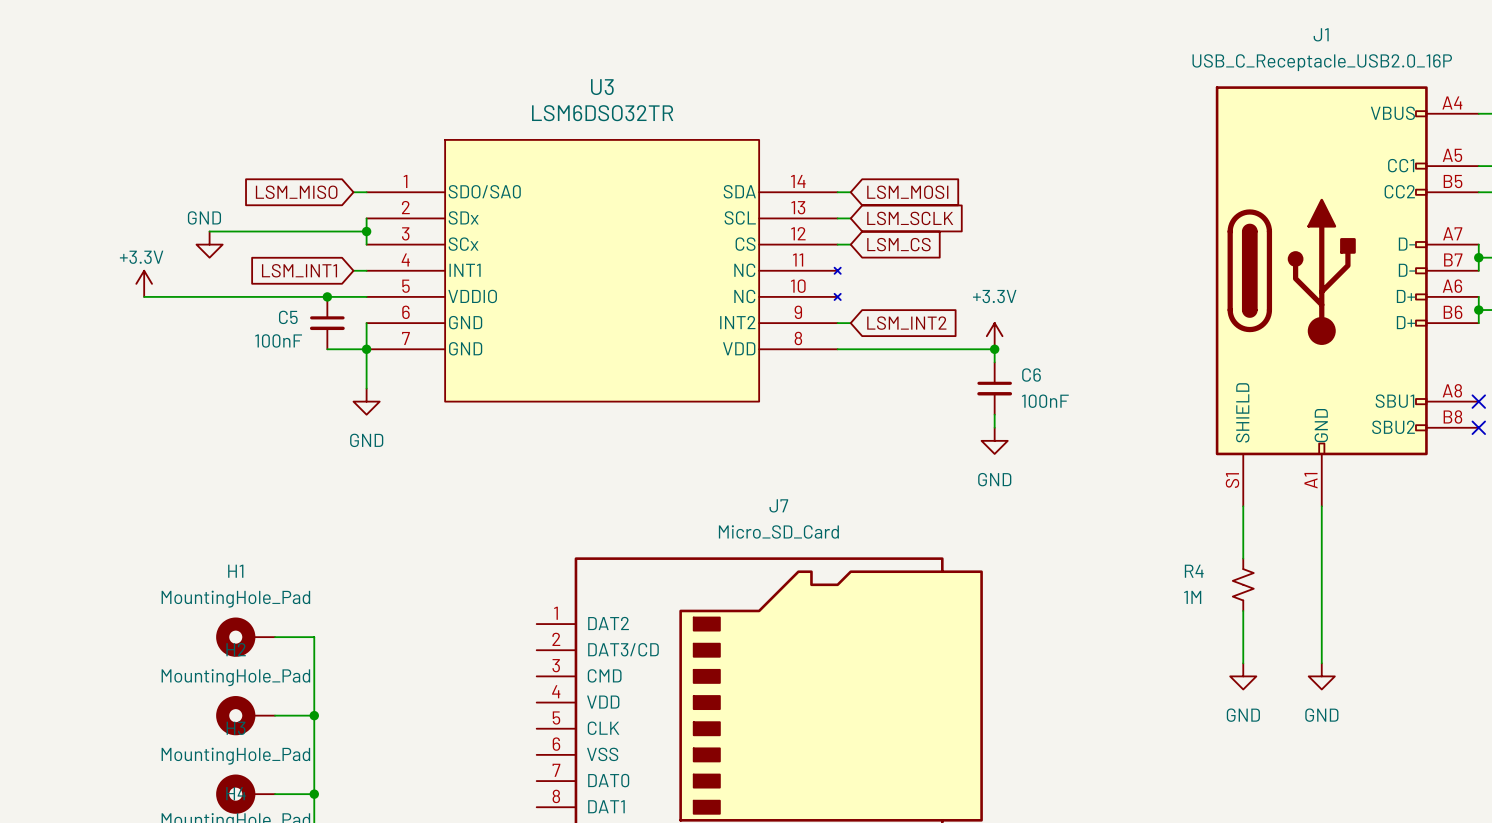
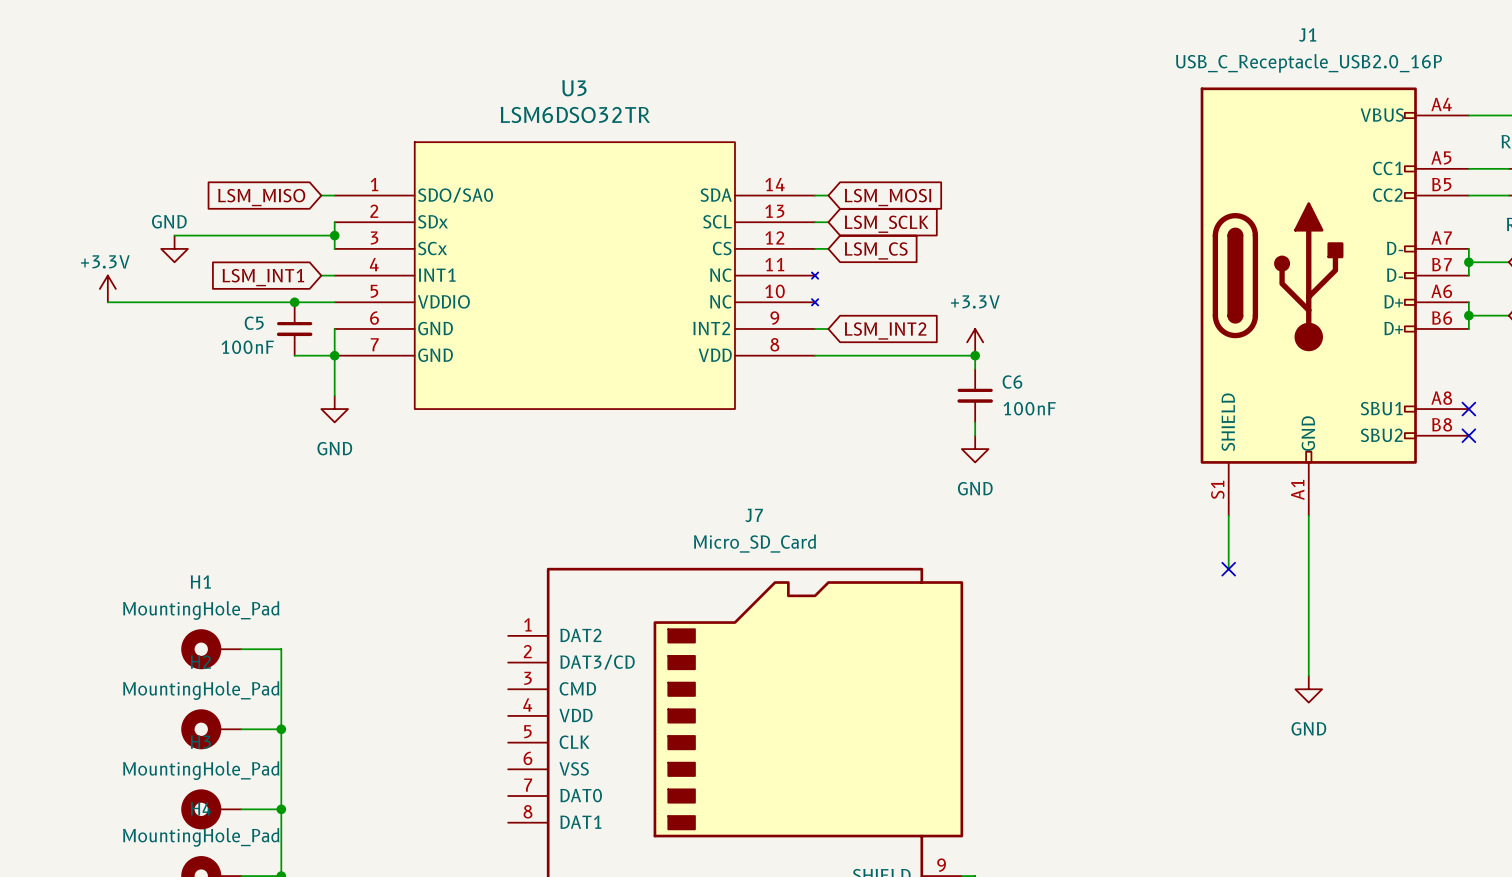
no-connect mark: none -> (1228, 569)
R4: 1M (1243, 584) -> none
wire: (1243, 610) (1243, 663) -> none
power symbol: GND (1243, 676) -> none

